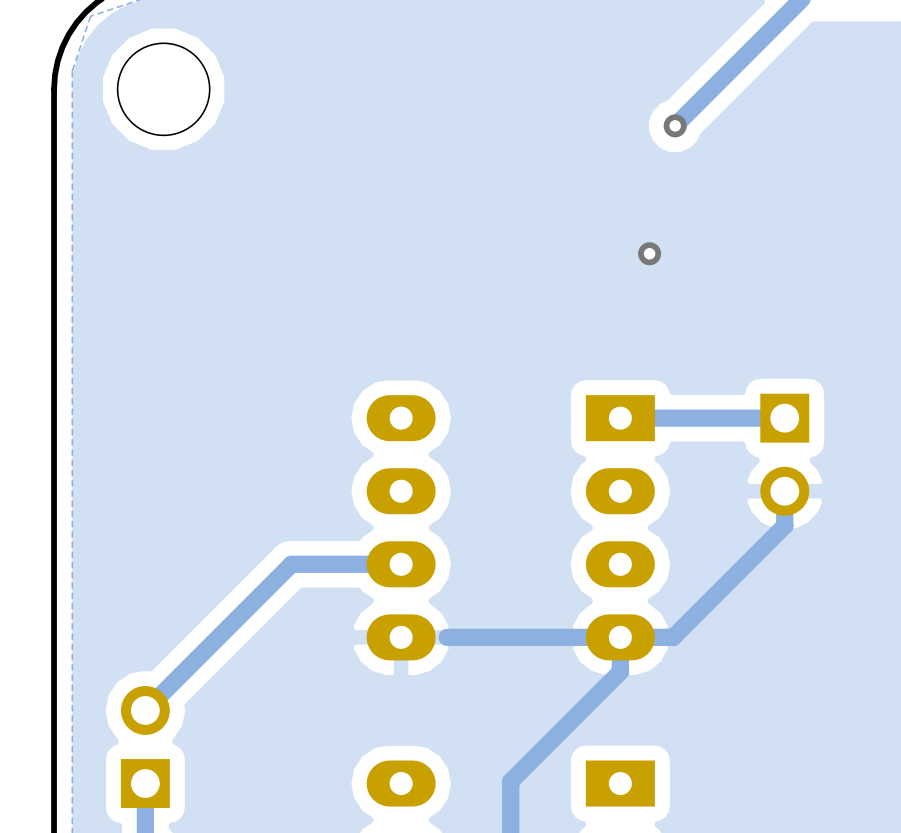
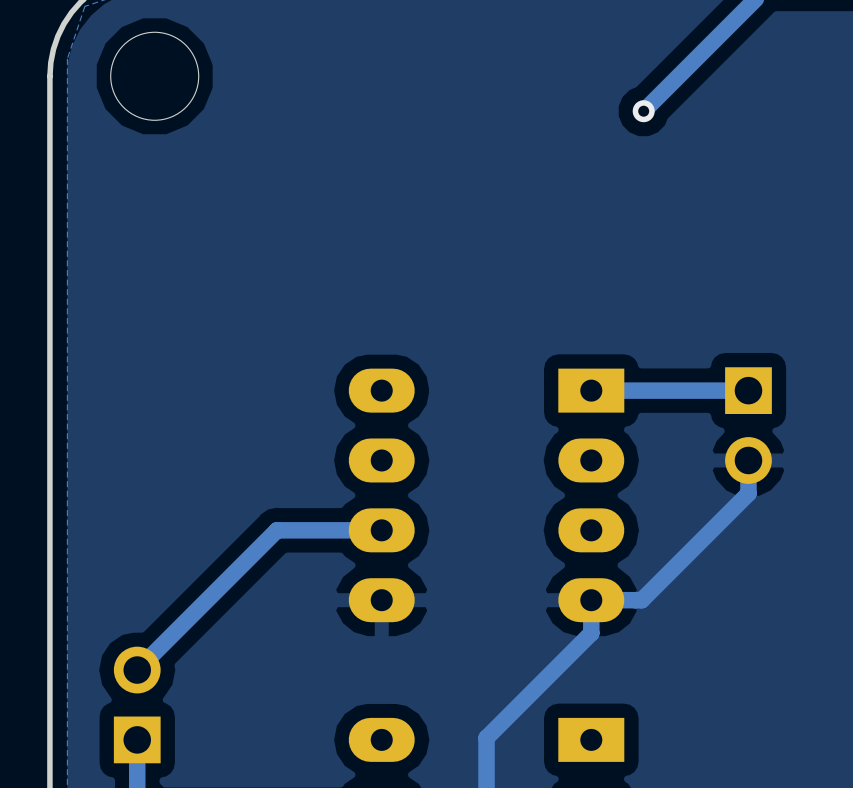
via: (649, 253) -> none
track: (620, 637) (447, 637) -> none

